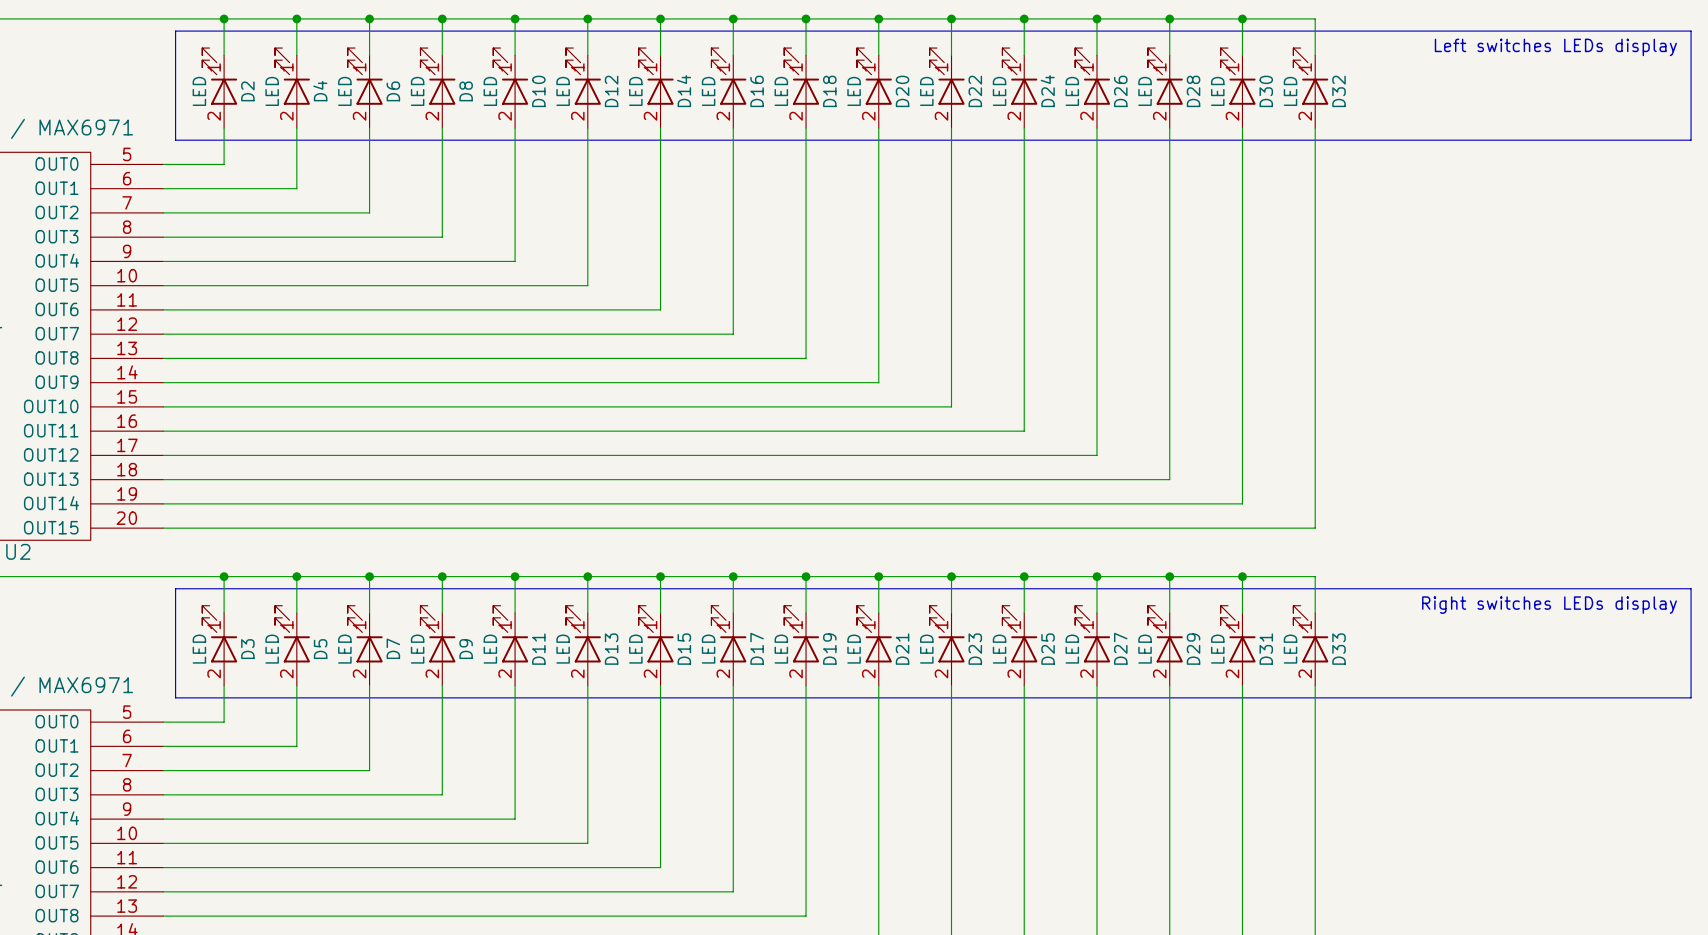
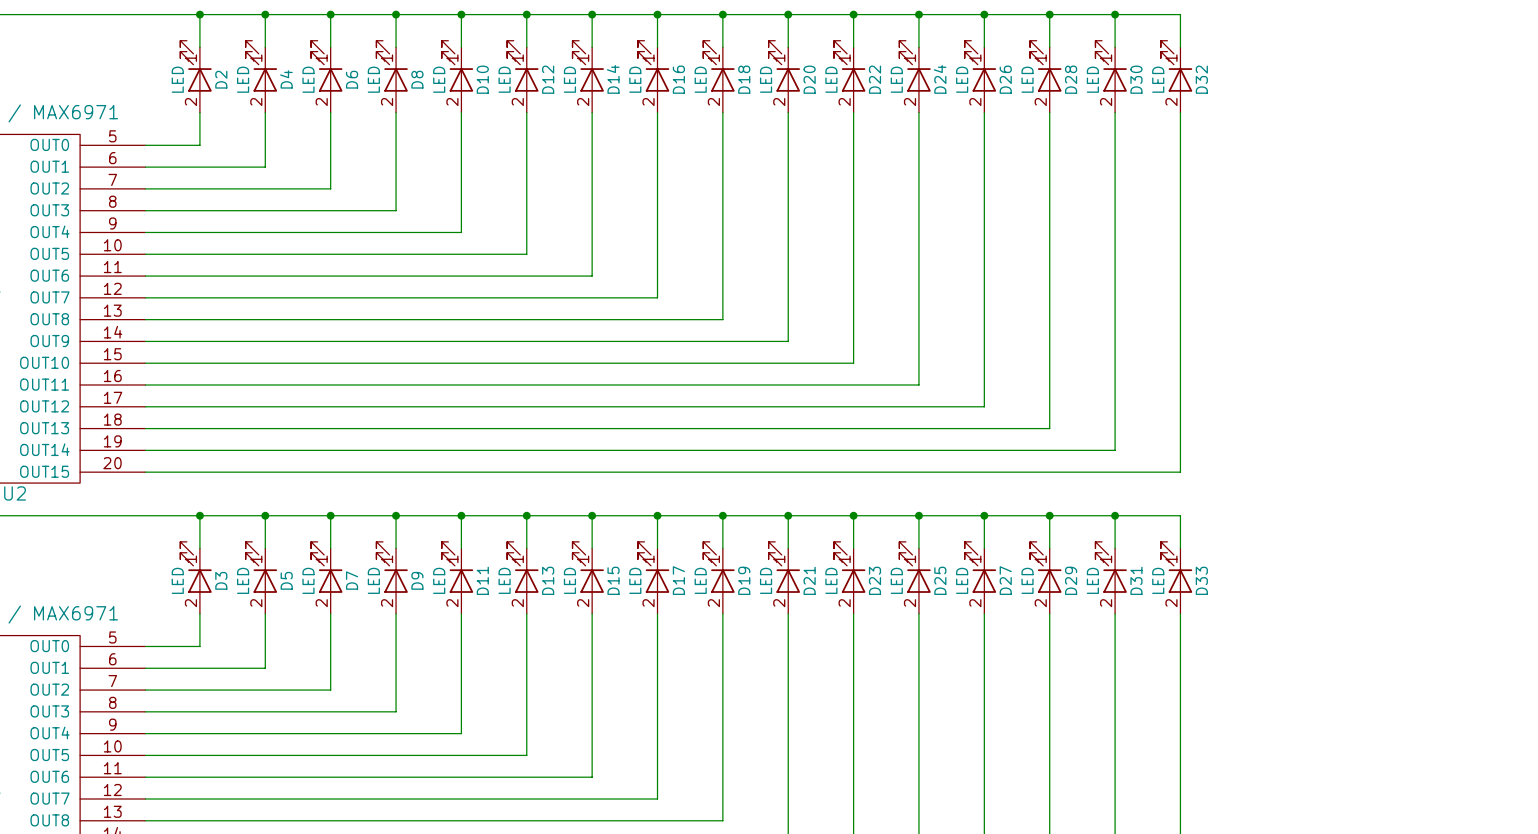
line: (175, 31) (175, 140) (1691, 140) (1691, 31) (175, 31) -> none
text: Left switches LEDs display (1555, 47) -> none
line: (175, 588) (1691, 588) (1691, 697) (175, 697) (175, 588) -> none
text: Right switches LEDs display (1549, 605) -> none

